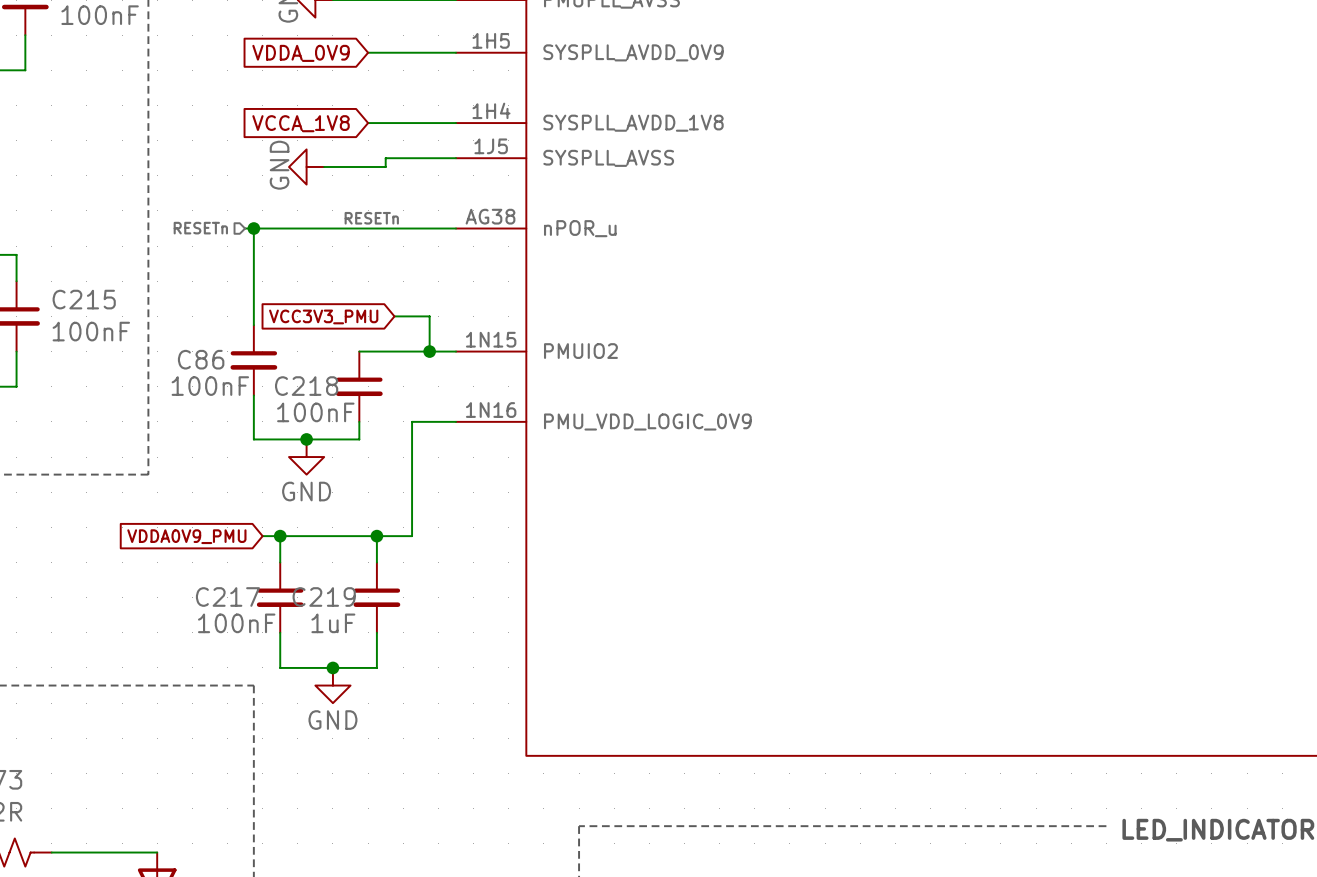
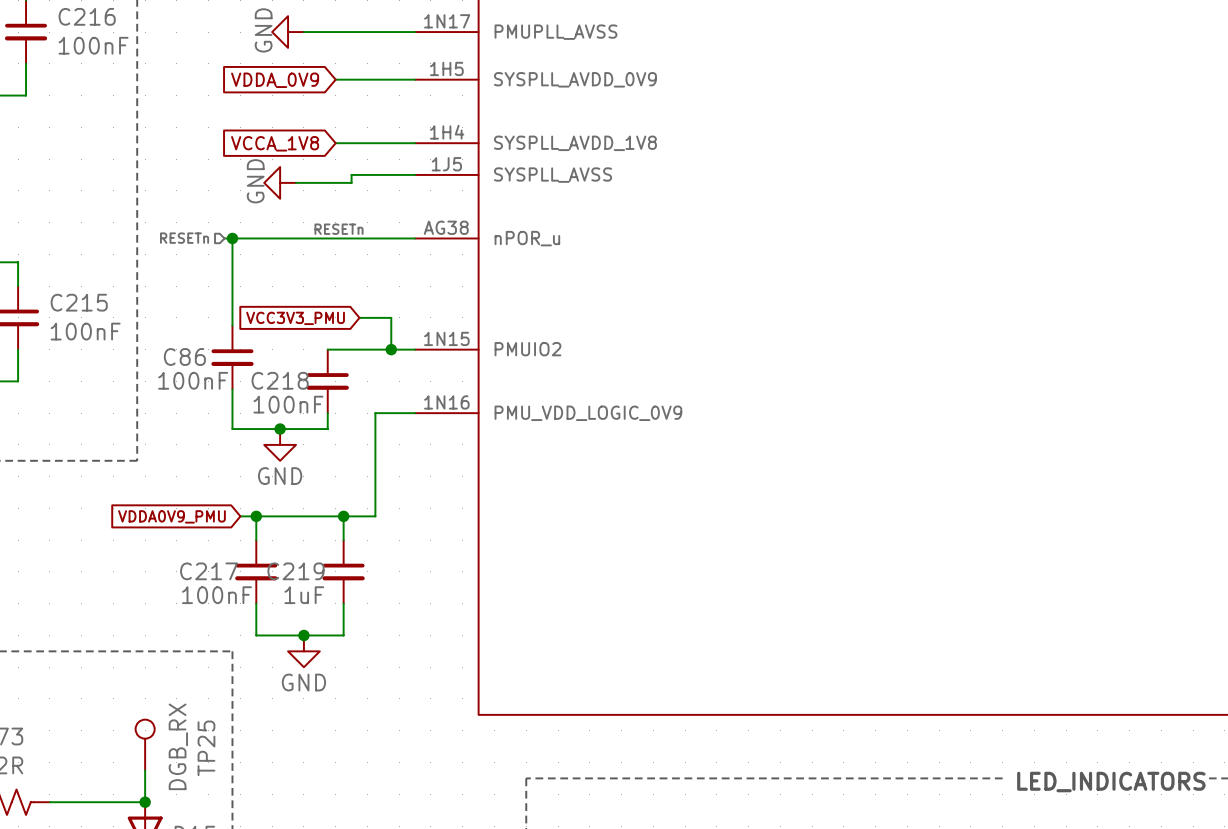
TP25: none -> DGB_RX (145, 745)
wire: none -> (145, 770) (145, 802)
junction: none -> (145, 802)

